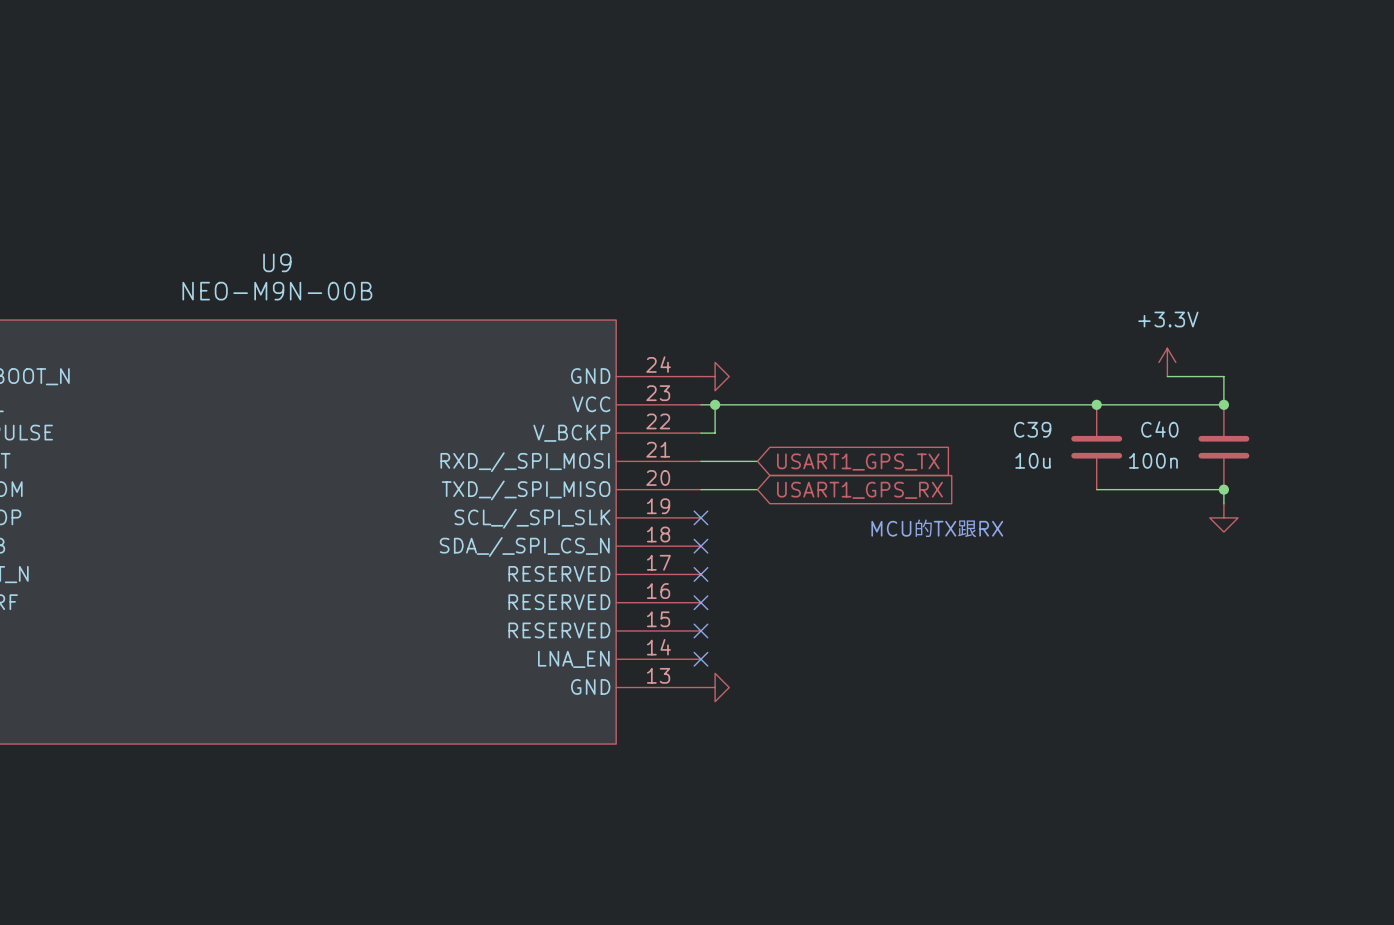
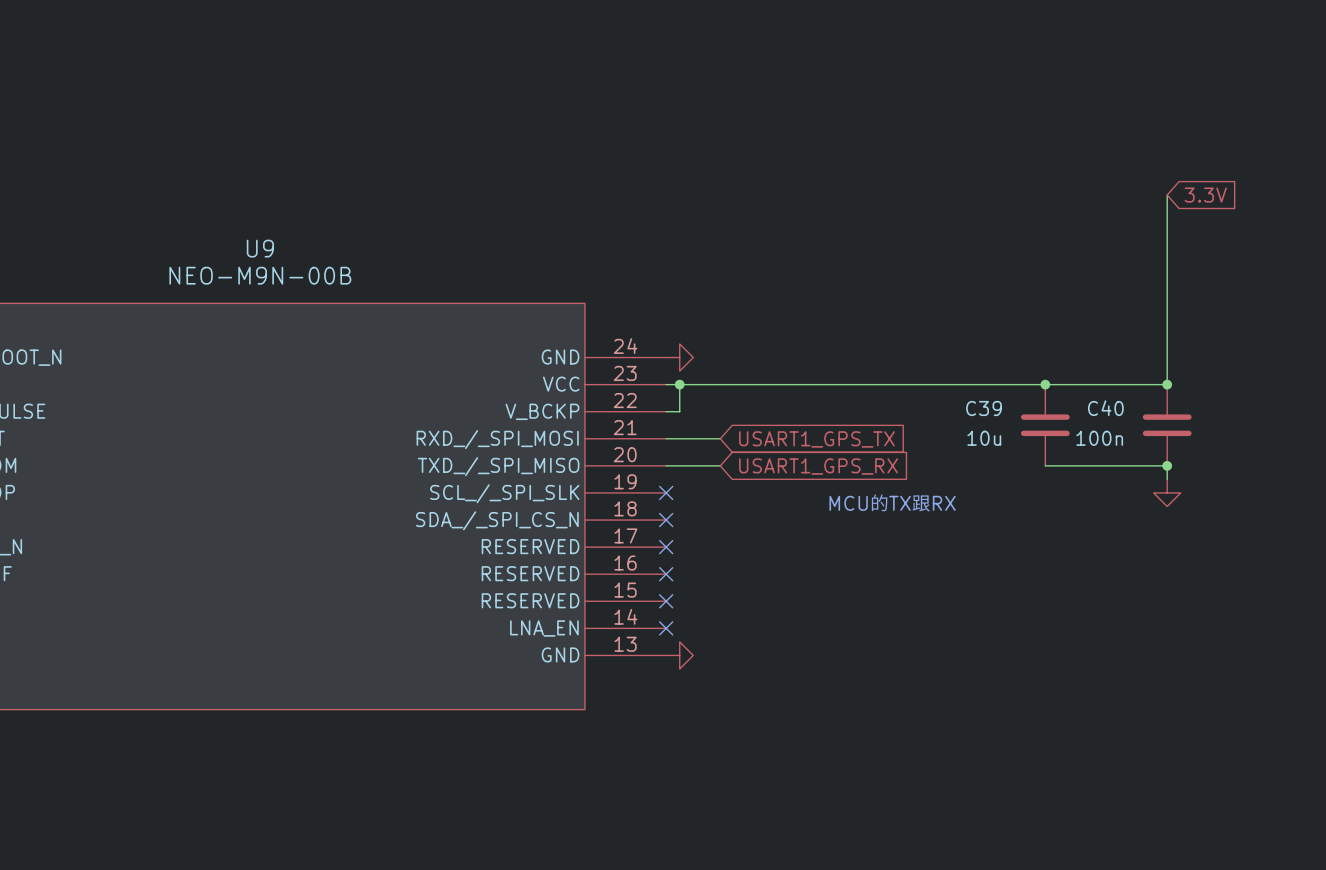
global label: none -> 3.3V (1205, 195)
power symbol: +3.3V (1167, 362) -> none
wire: (1167, 376) (1223, 376) -> (1167, 195) (1167, 357)

